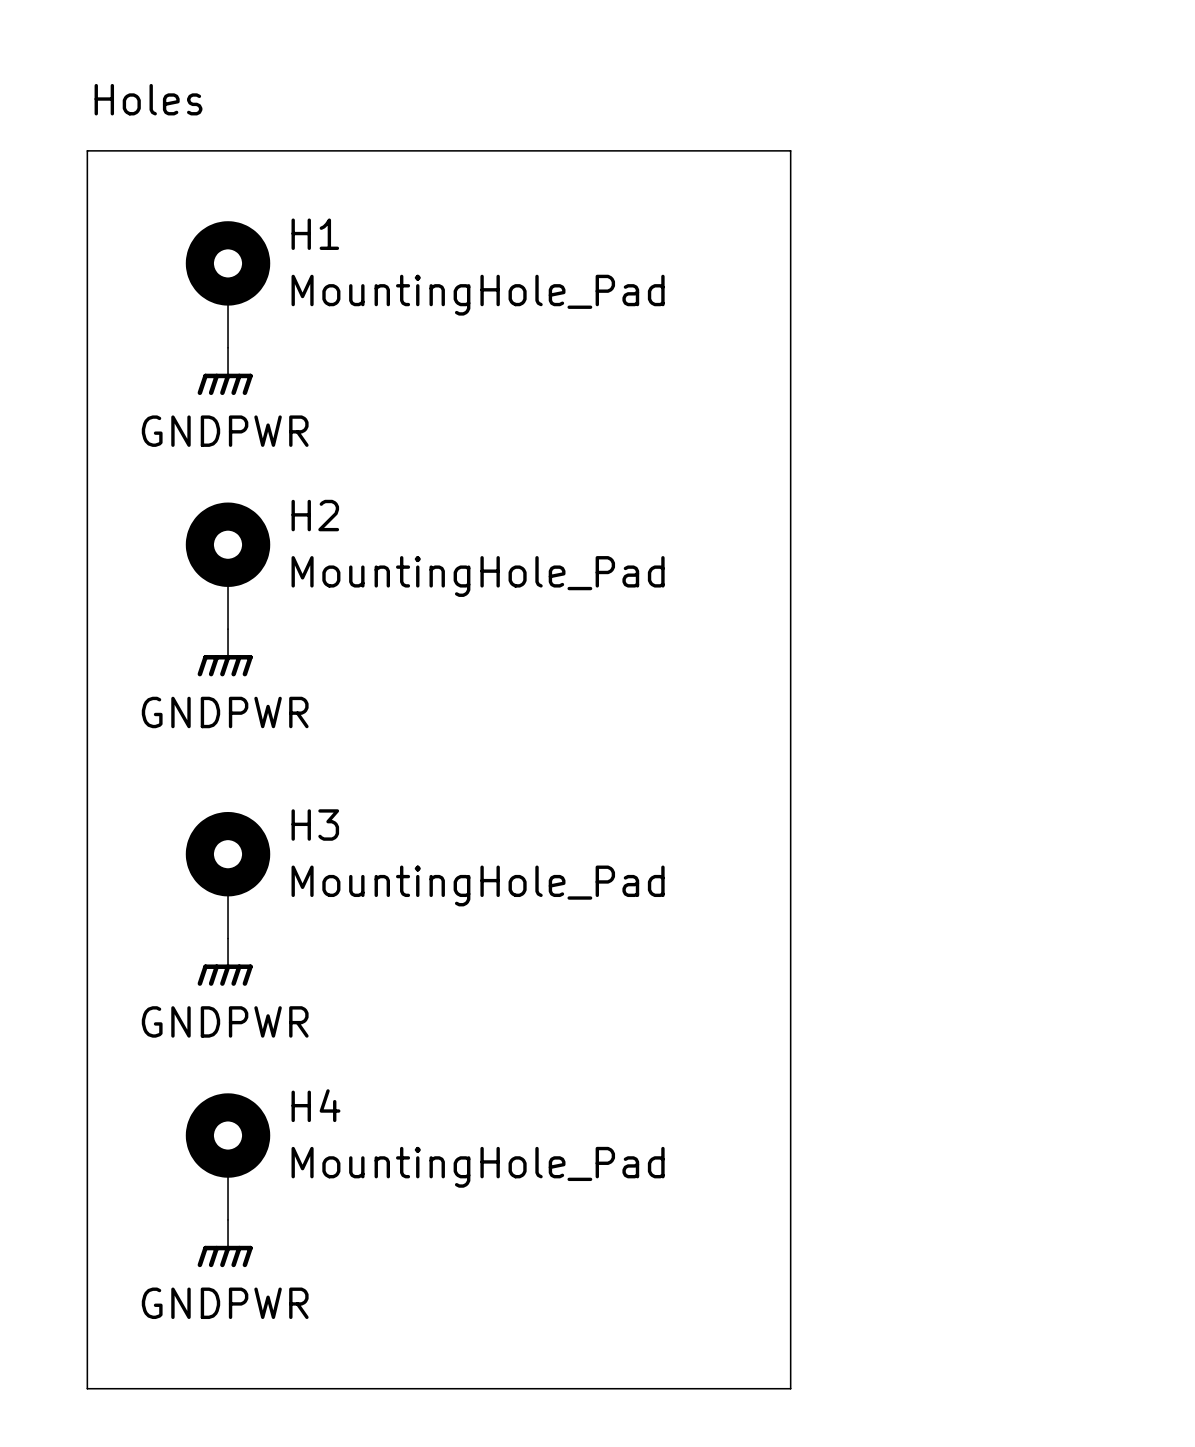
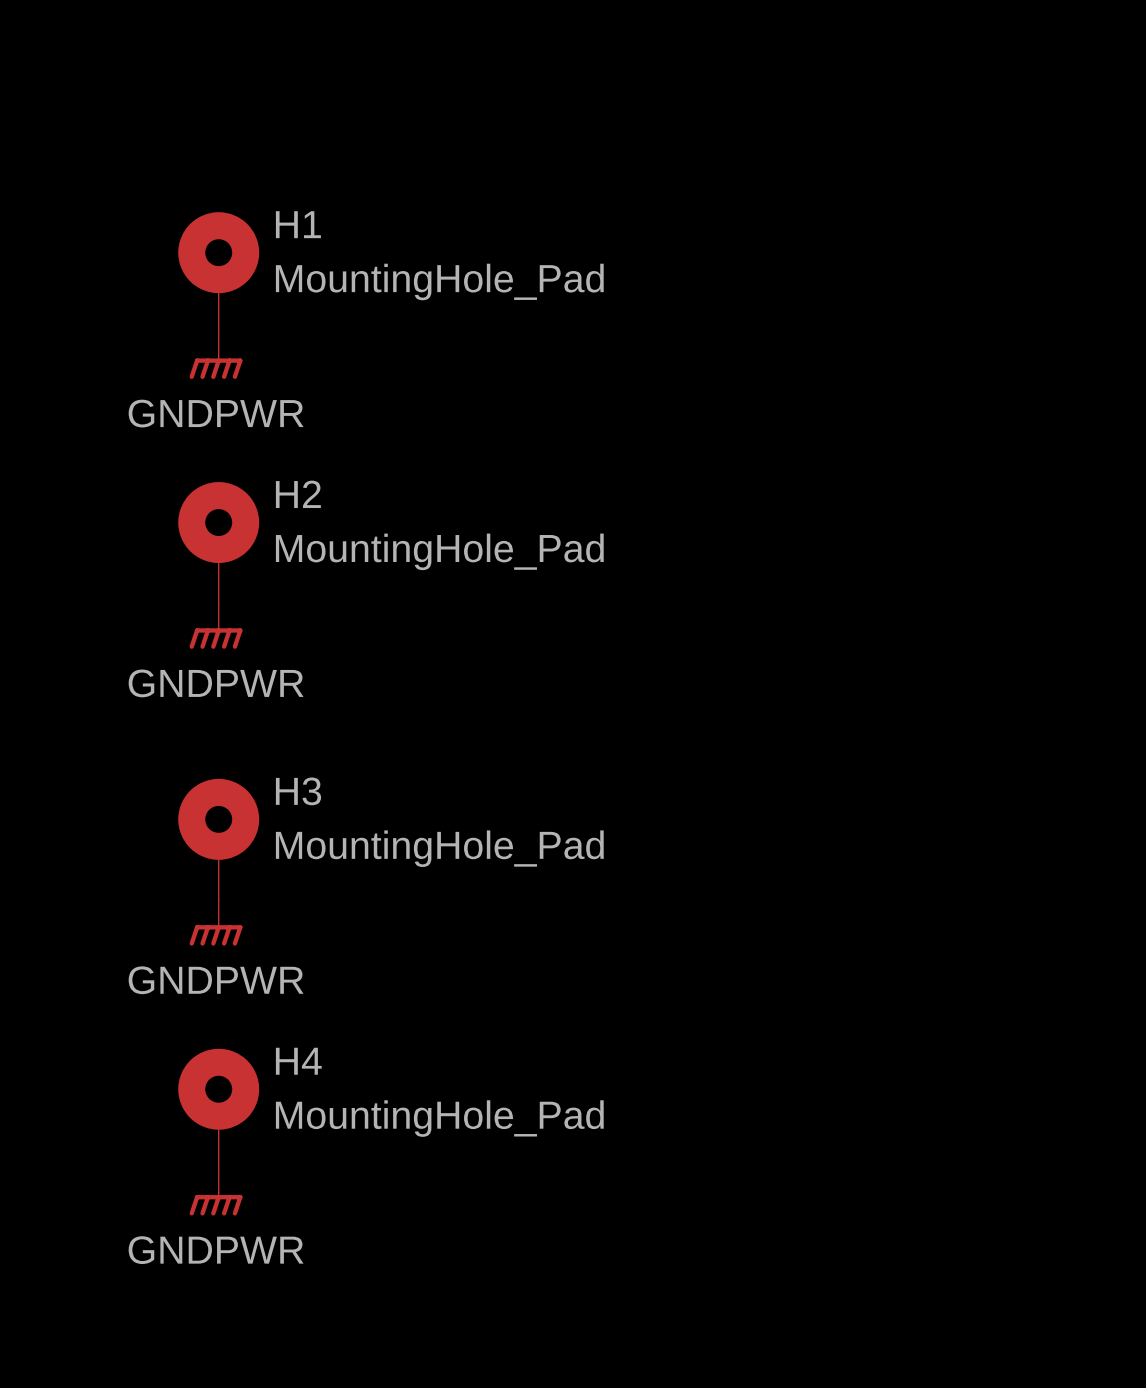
text: Holes (148, 99) -> none
line: (87, 150) (790, 150) (790, 1388) (87, 1388) (87, 150) -> none

